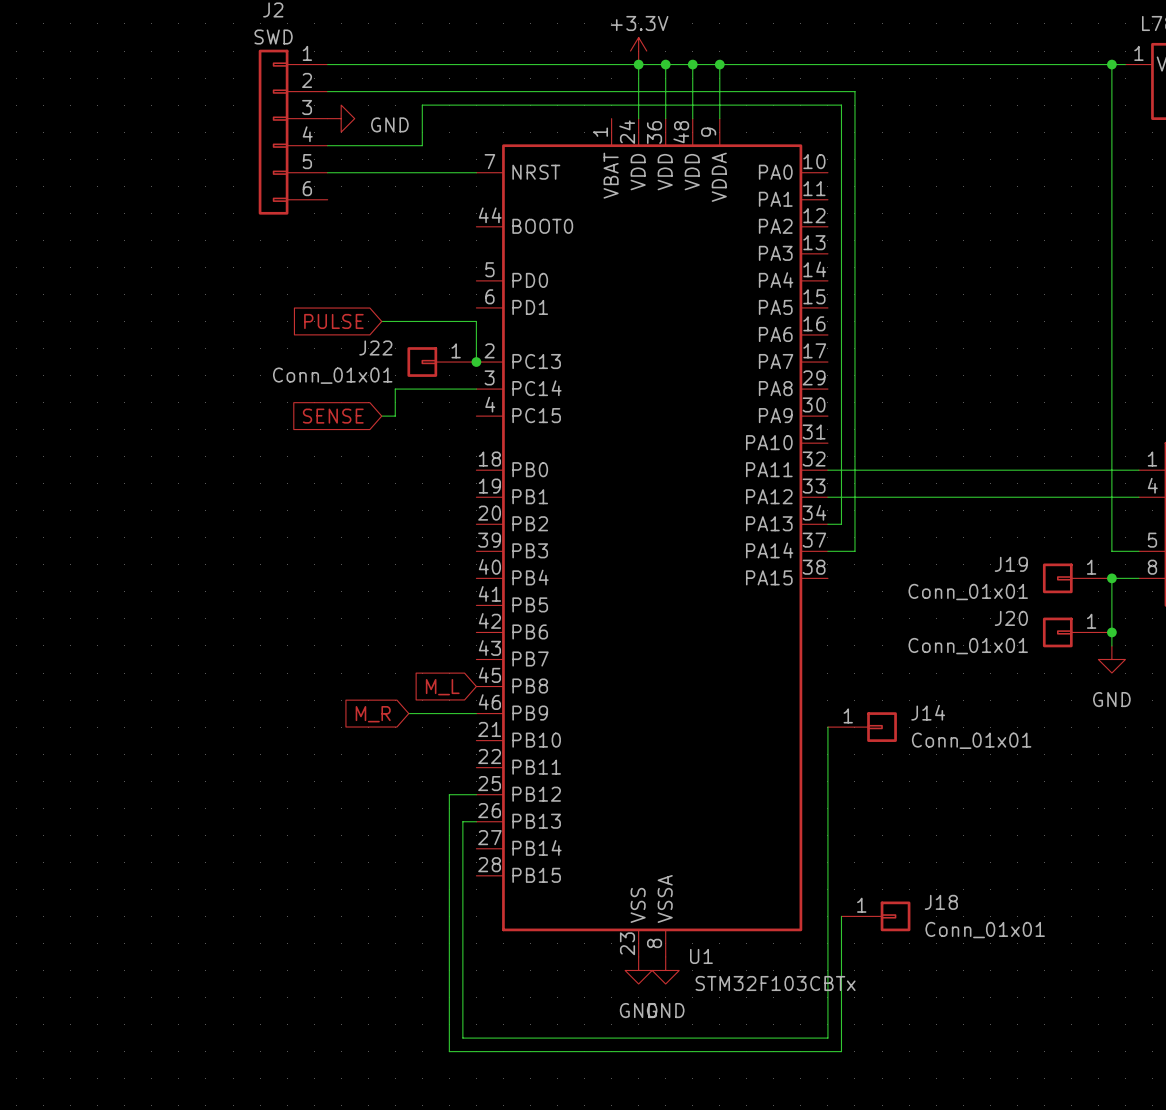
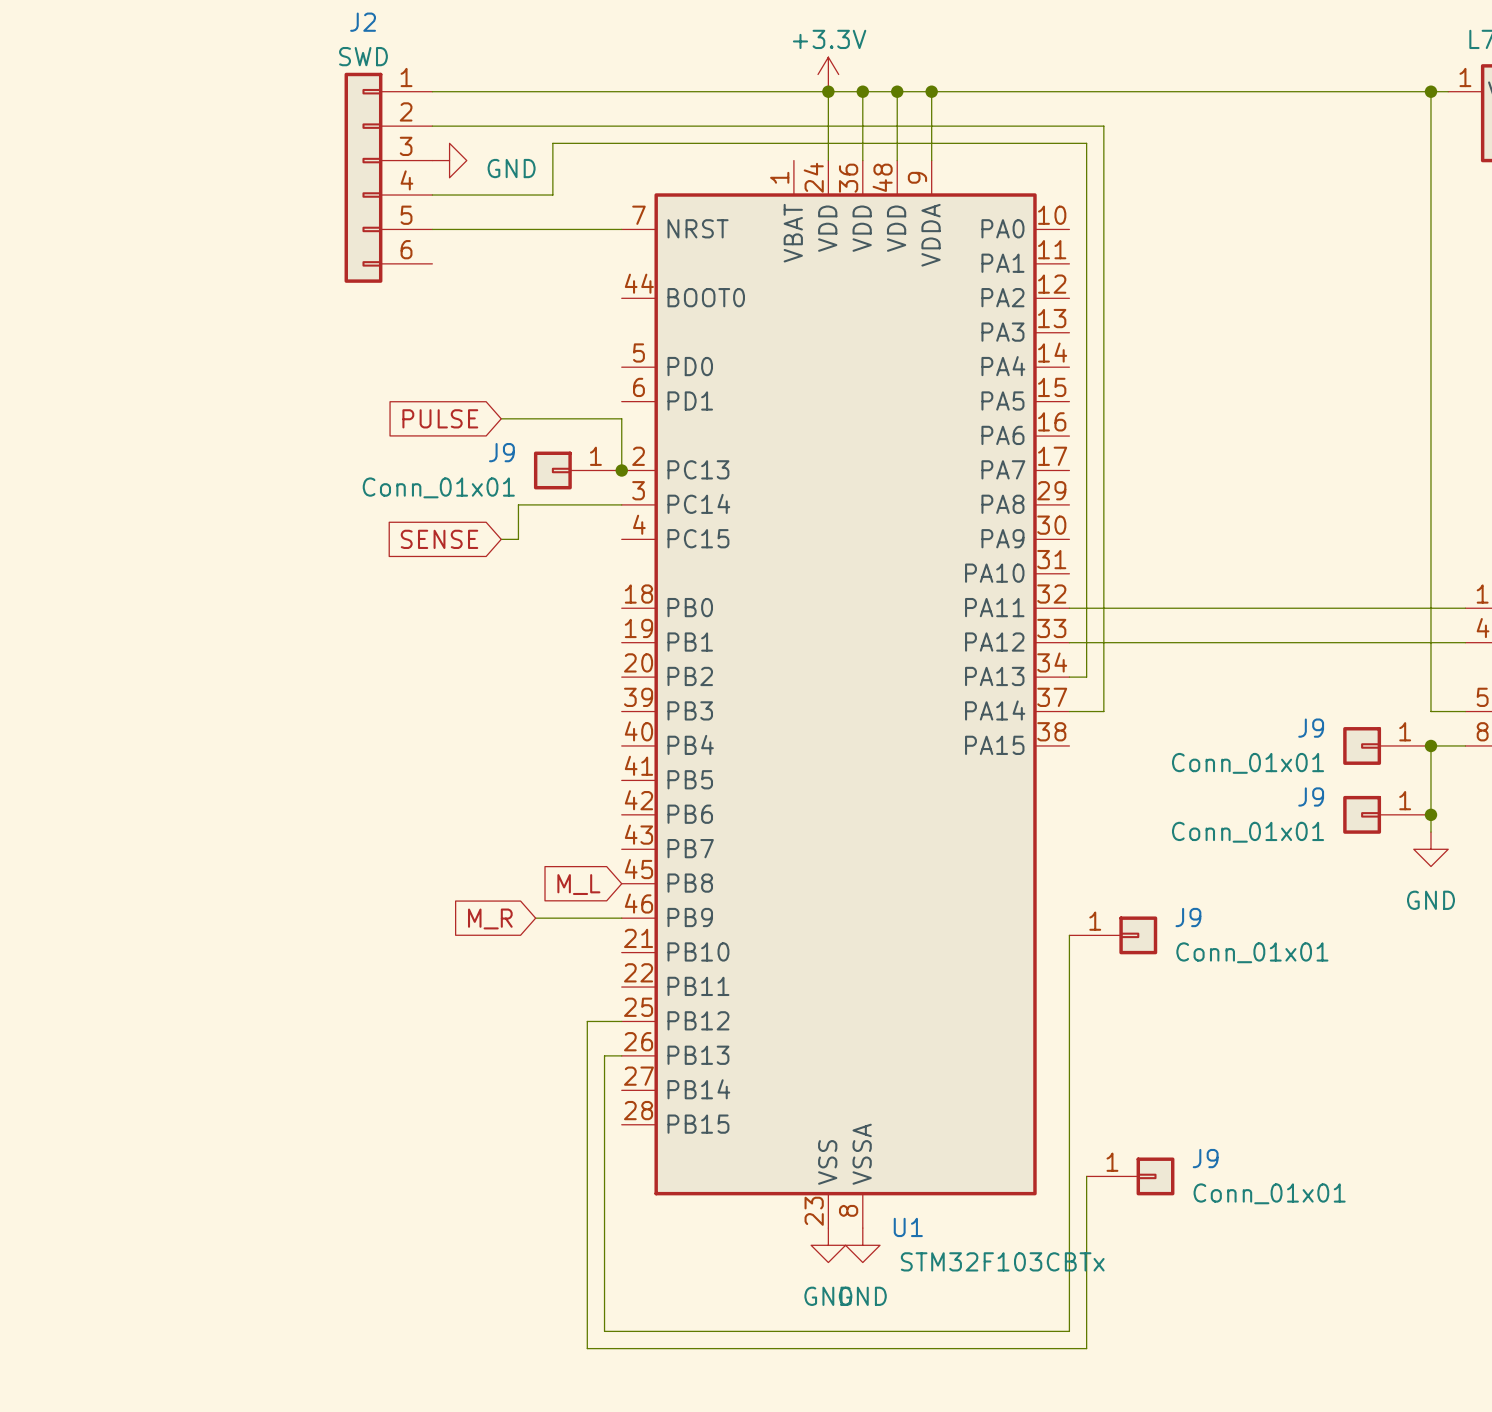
J22 name: J22 (375, 348) -> J9 (501, 452)
J19 name: J19 (1011, 564) -> J9 (1311, 728)
J20 name: J20 (1011, 618) -> J9 (1311, 796)
J14 name: J14 (928, 712) -> J9 (1188, 917)
J18 name: J18 (941, 902) -> J9 (1205, 1158)

